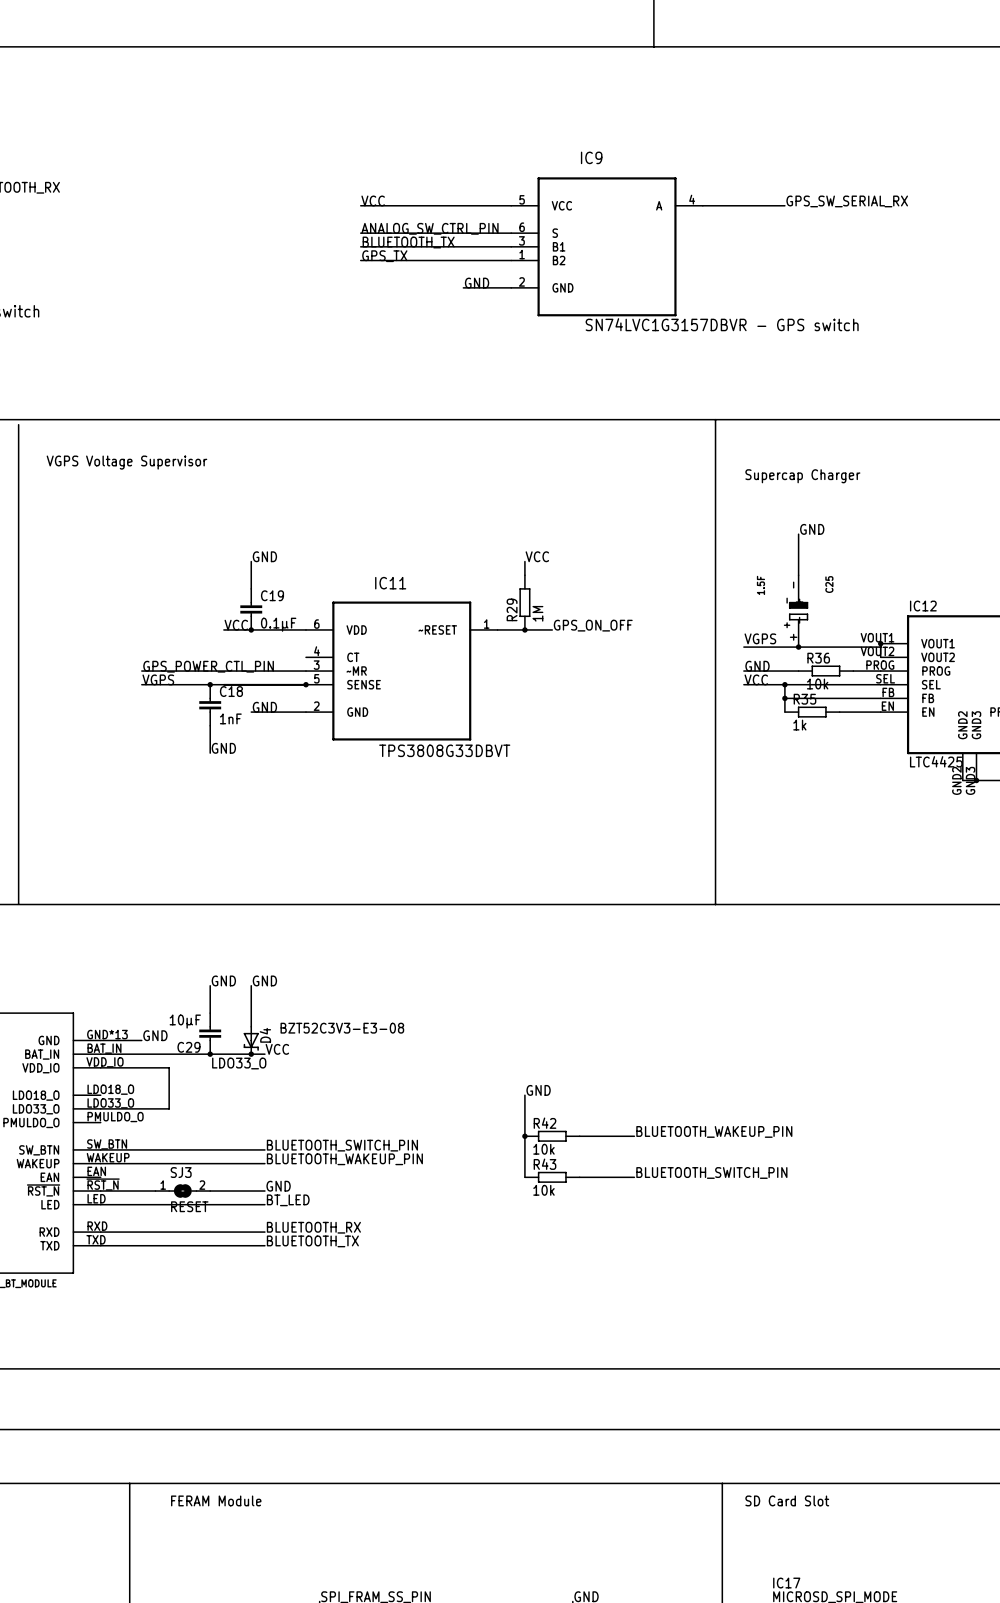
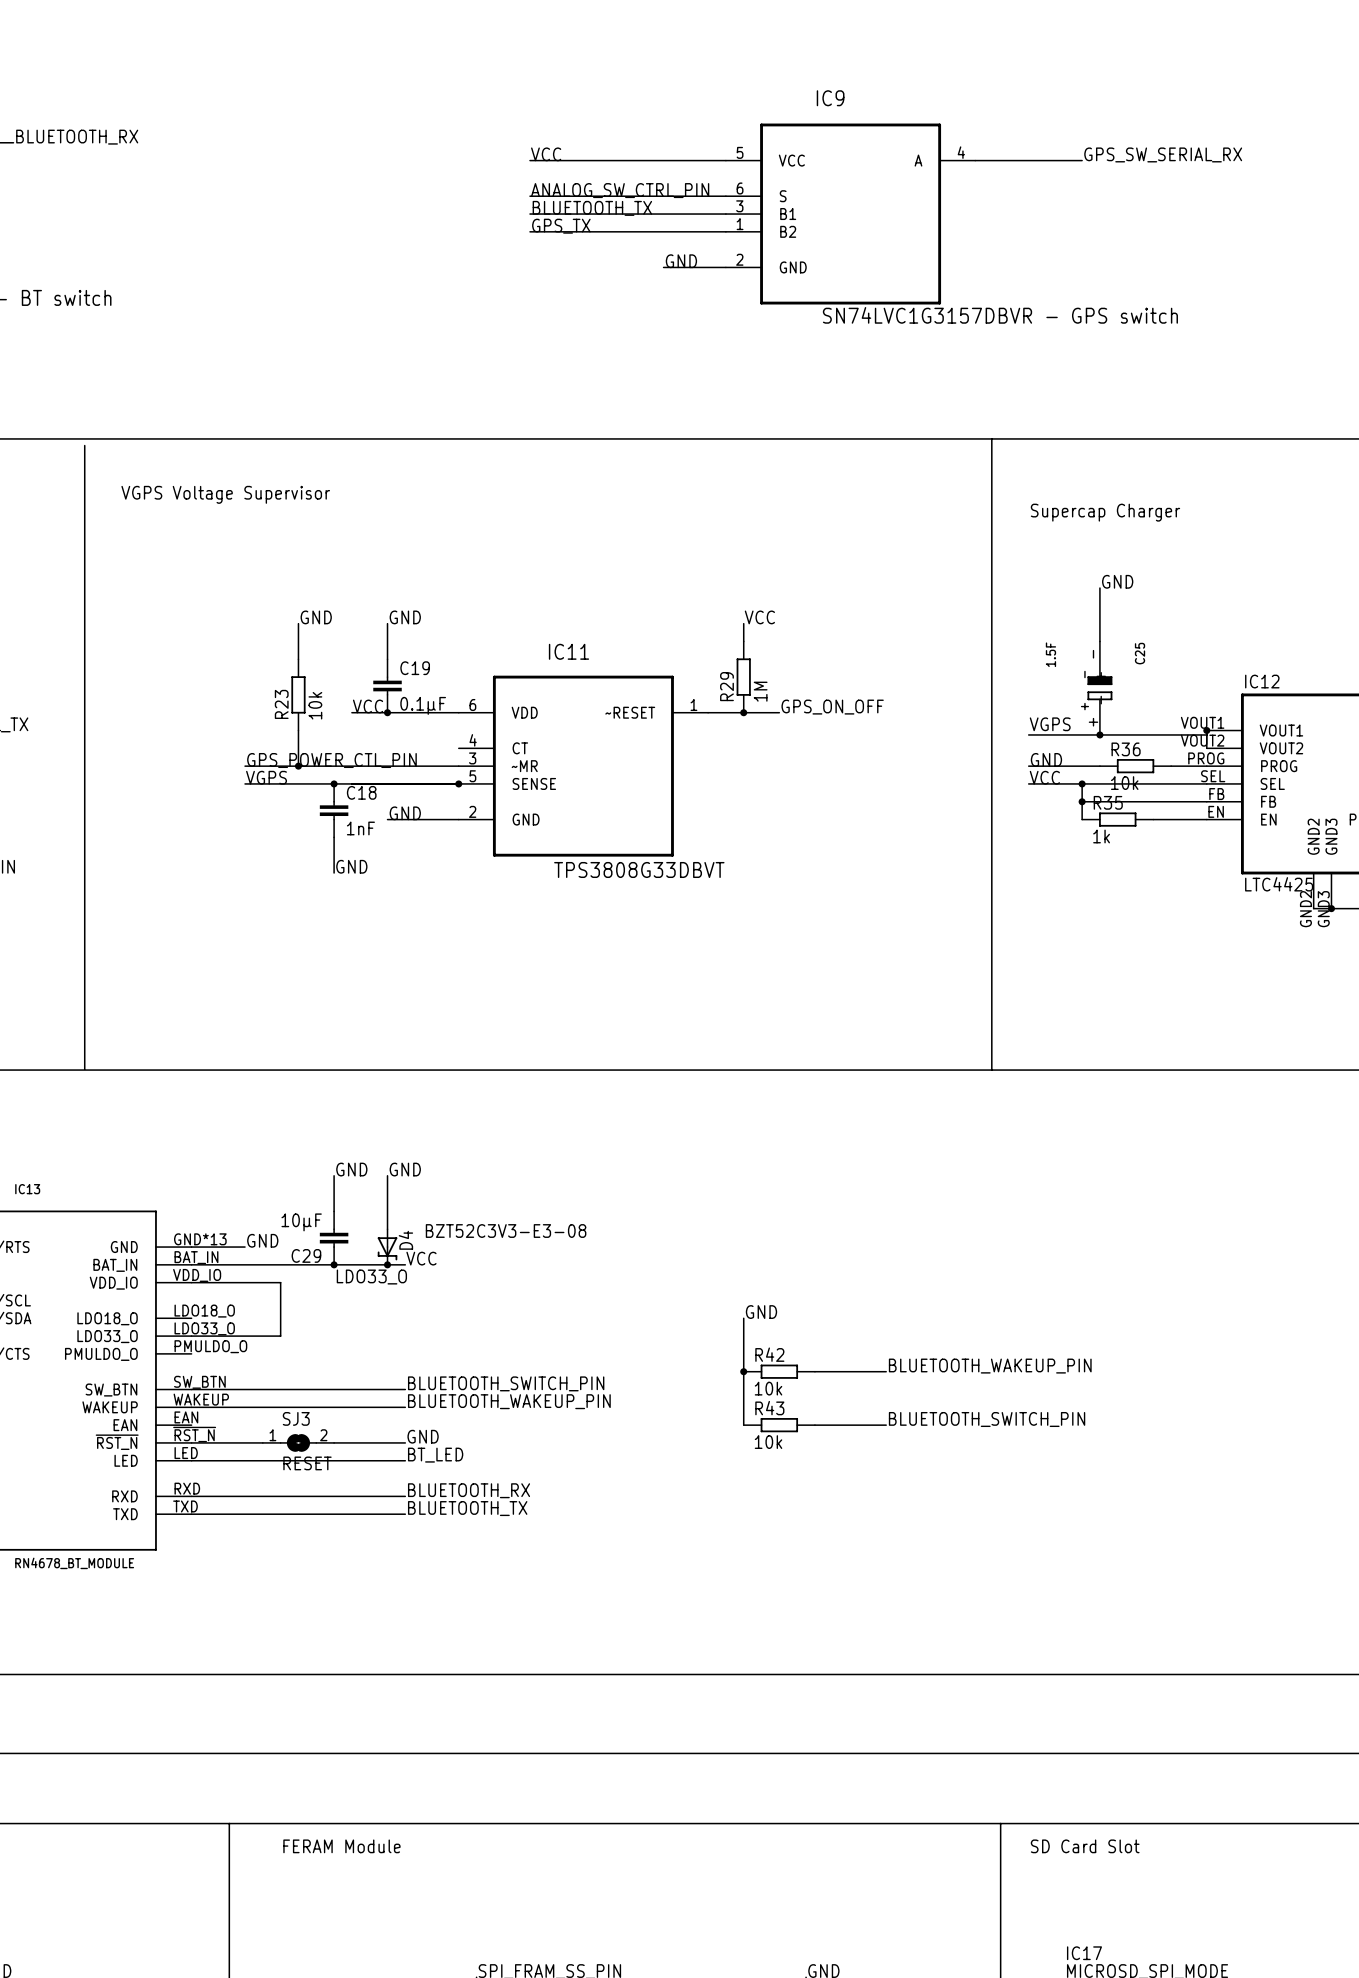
label: none -> GND (316, 617)
wire: none -> (298, 623) (298, 659)
R23: none -> 10k (298, 694)
wire: none -> (298, 730) (298, 766)
junction: none -> (298, 766)

